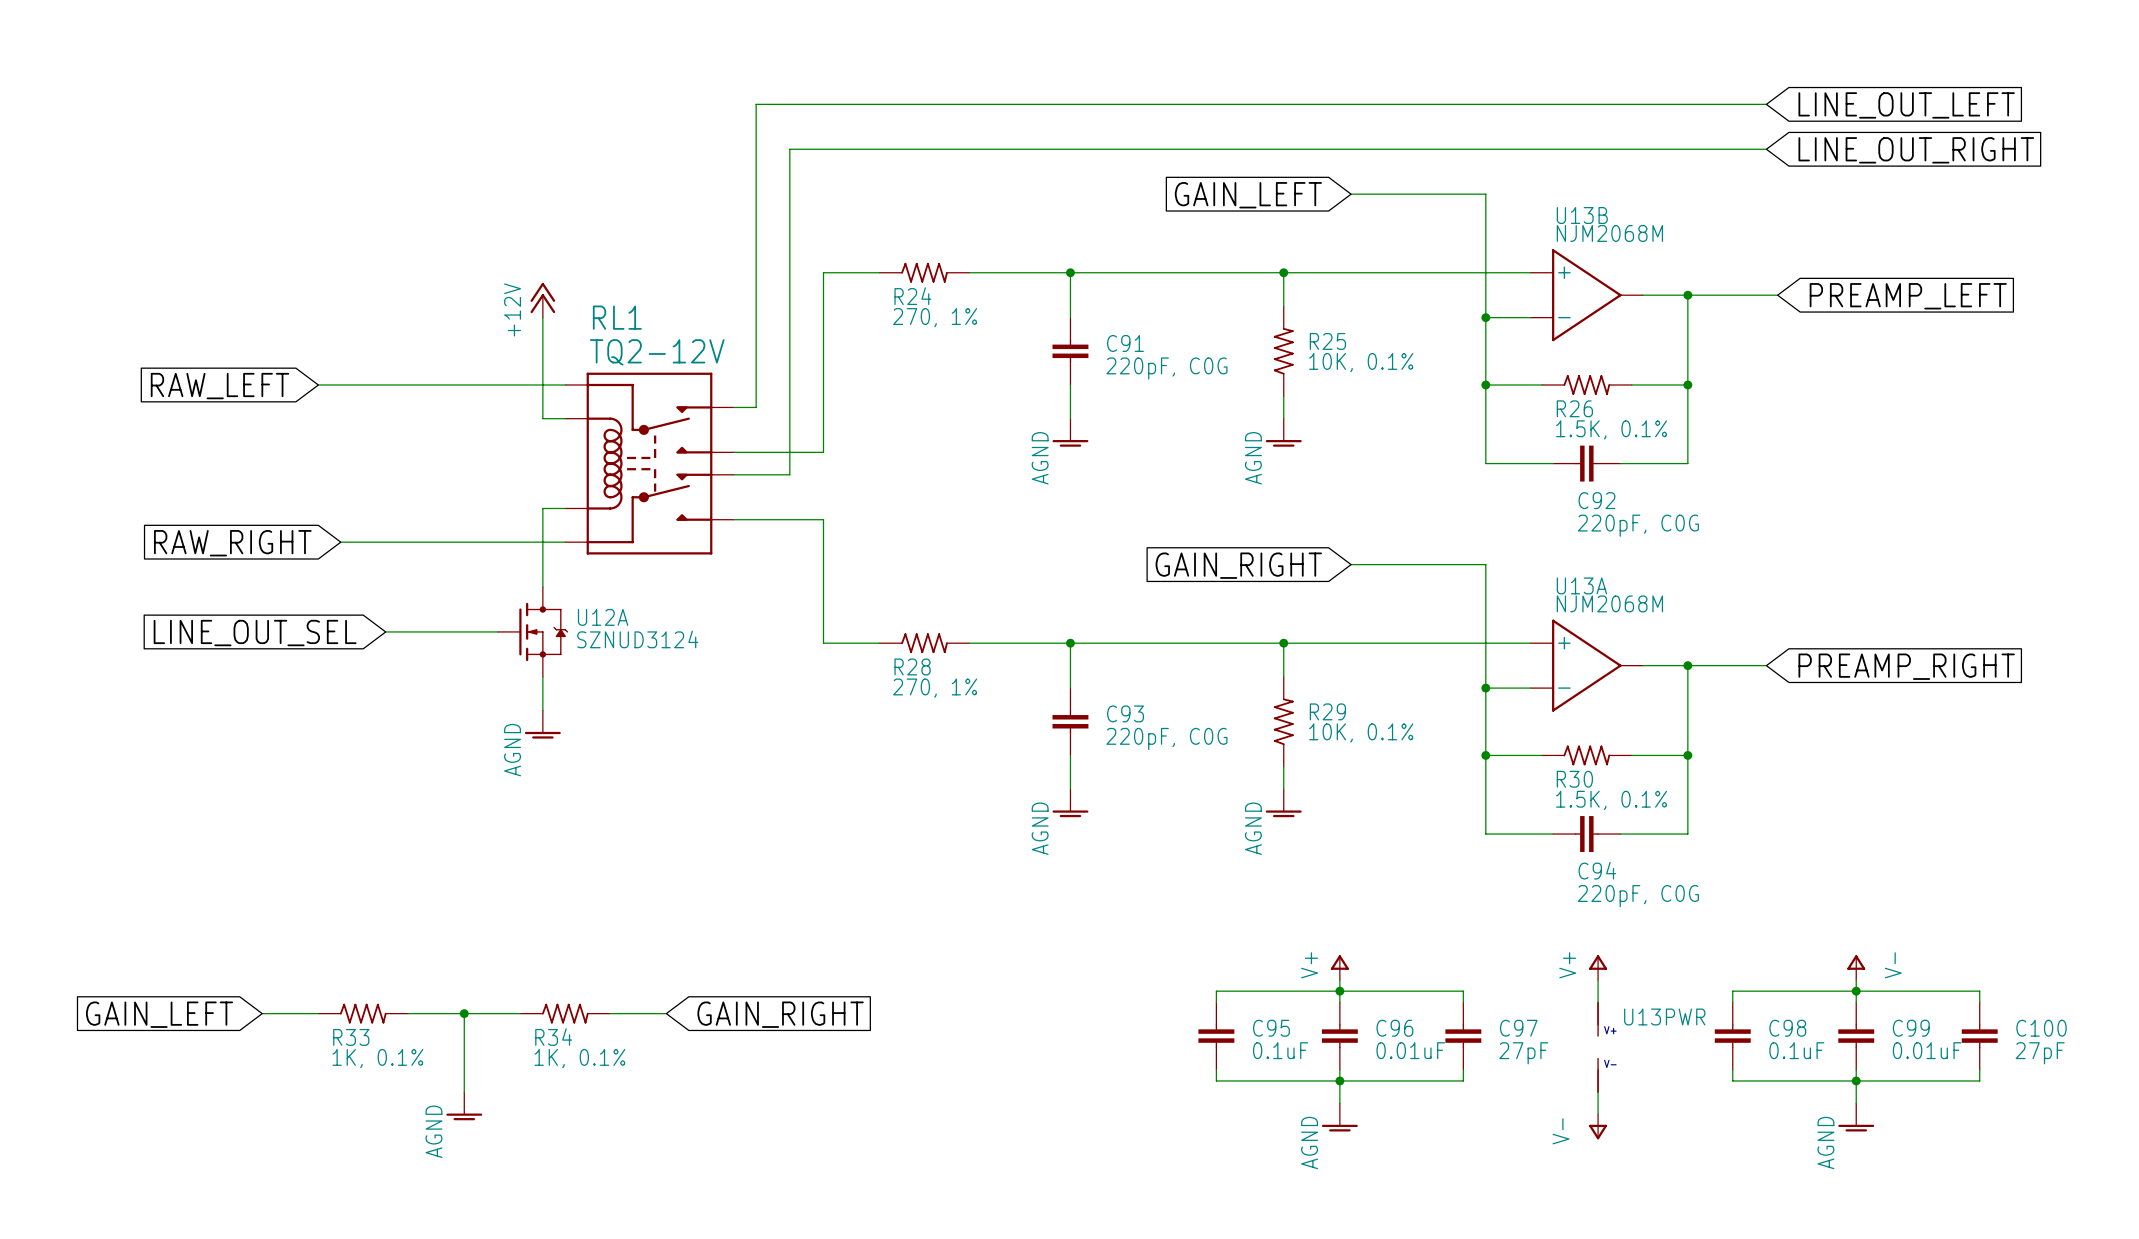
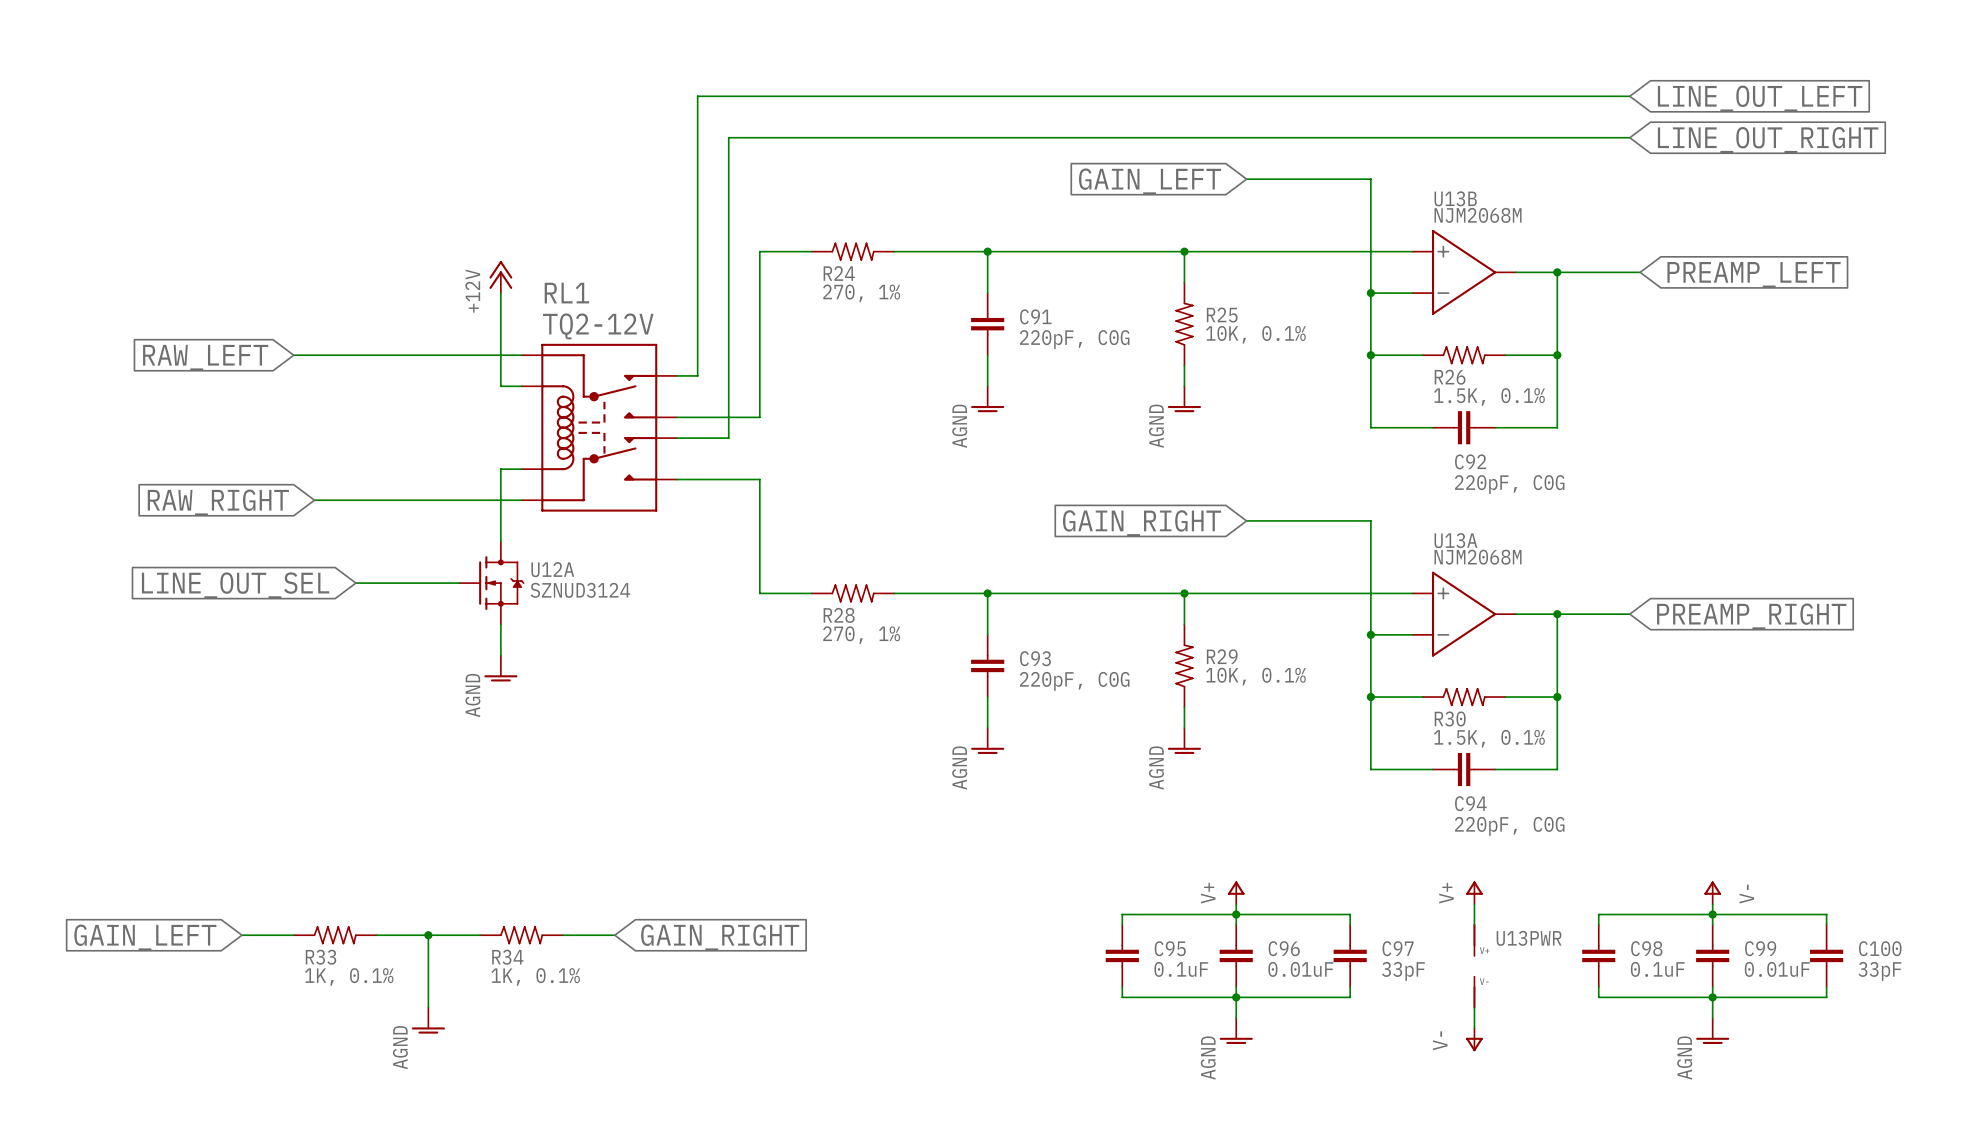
C97 value: 27pF (1523, 1053) -> 33pF (1403, 971)
C100 value: 27pF (2040, 1053) -> 33pF (1879, 971)

